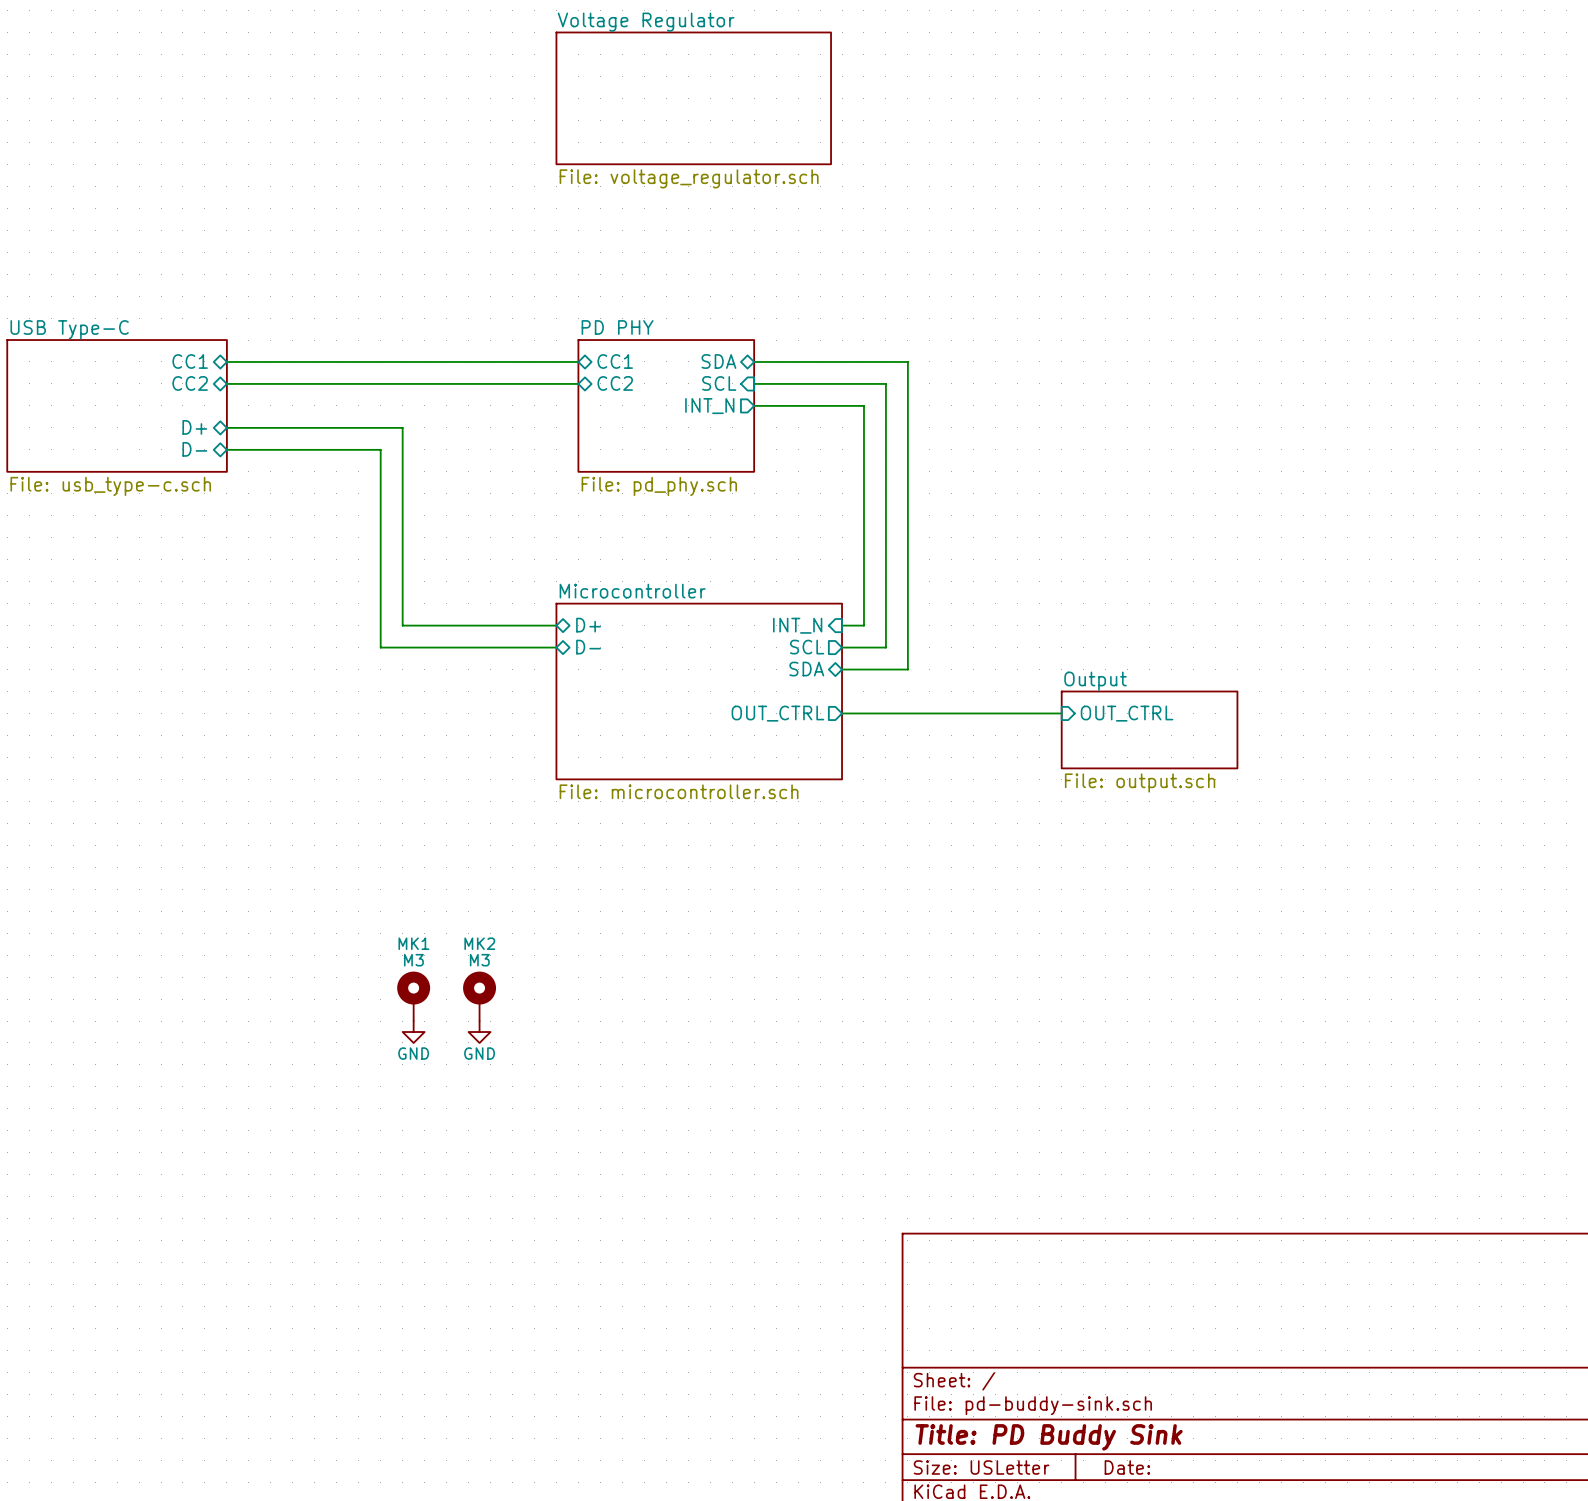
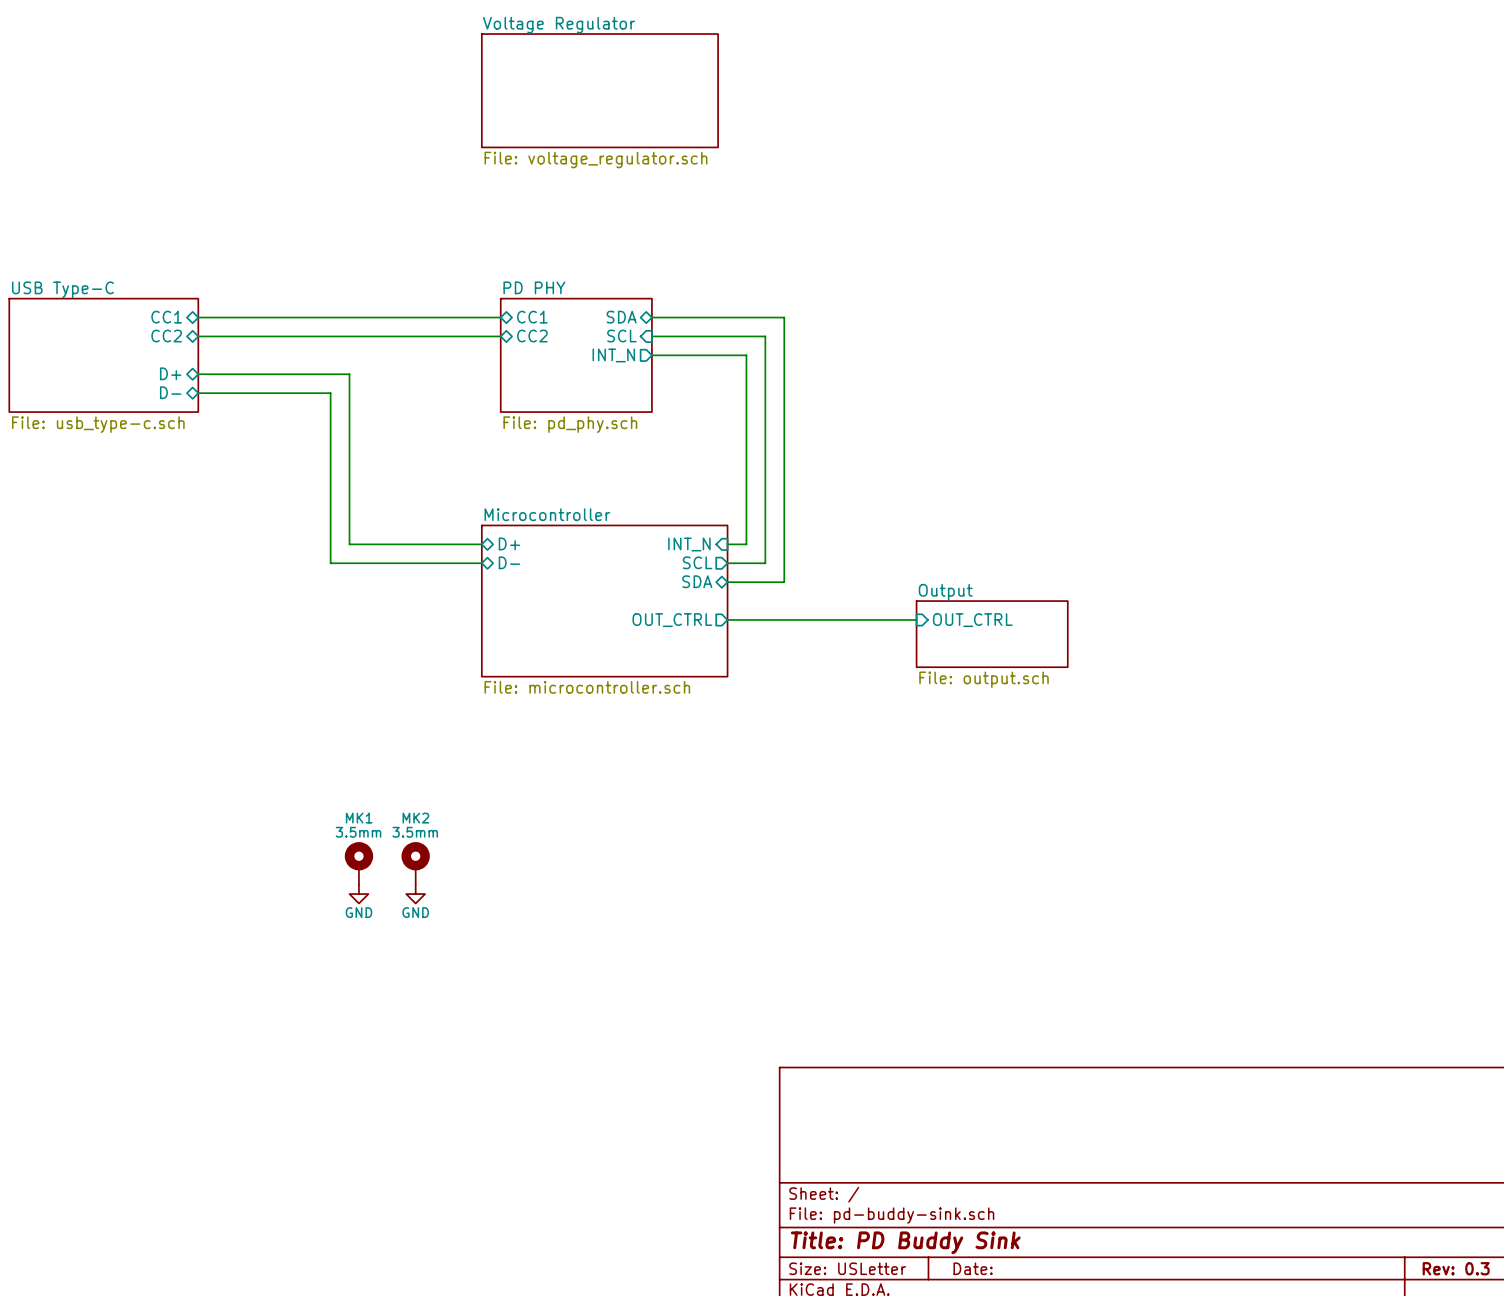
MK1 value: M3 (413, 960) -> 3.5mm (358, 832)
MK2 value: M3 (479, 960) -> 3.5mm (415, 832)

